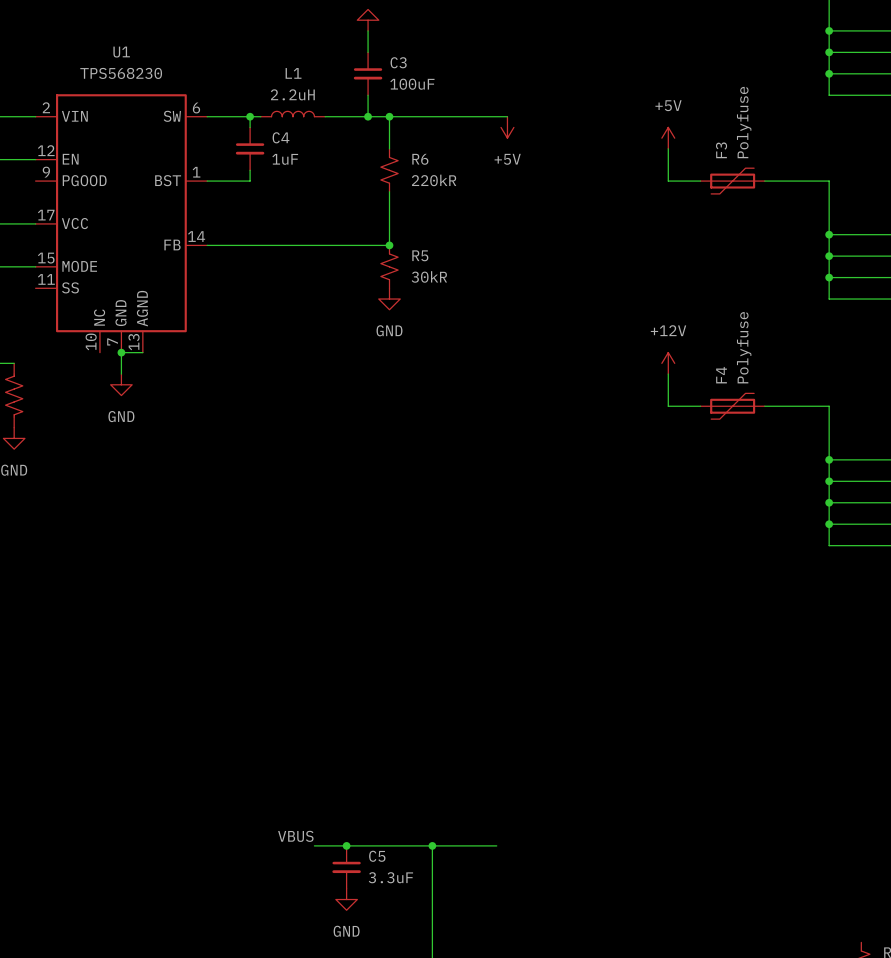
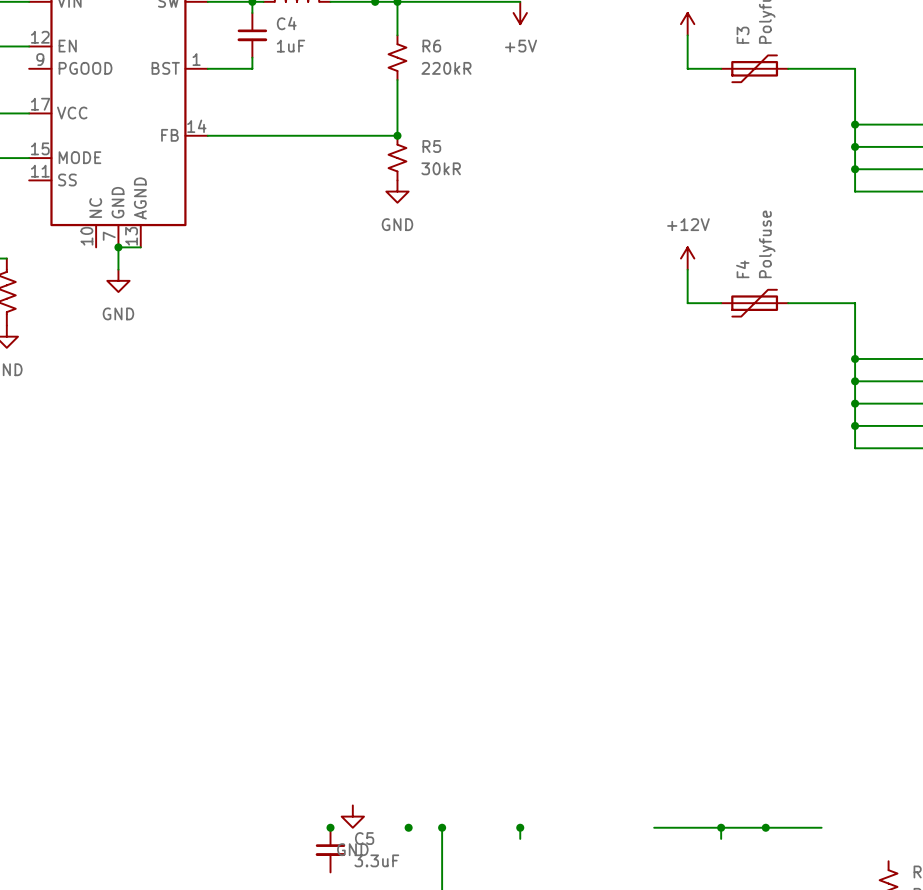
label: VBUS (295, 836) -> none
wire: (314, 845) (496, 845) -> none
junction: (346, 845) -> none
wire: (432, 845) (432, 910) -> none
junction: (432, 845) -> none
C5 position: (346, 867) -> (330, 850)
junction: none -> (330, 827)
junction: none -> (408, 827)
junction: none -> (442, 827)
wire: none -> (520, 827) (520, 838)
junction: none -> (520, 827)
wire: none -> (654, 827) (821, 827)
wire: none -> (721, 827) (721, 838)
junction: none -> (721, 827)
junction: none -> (765, 827)

